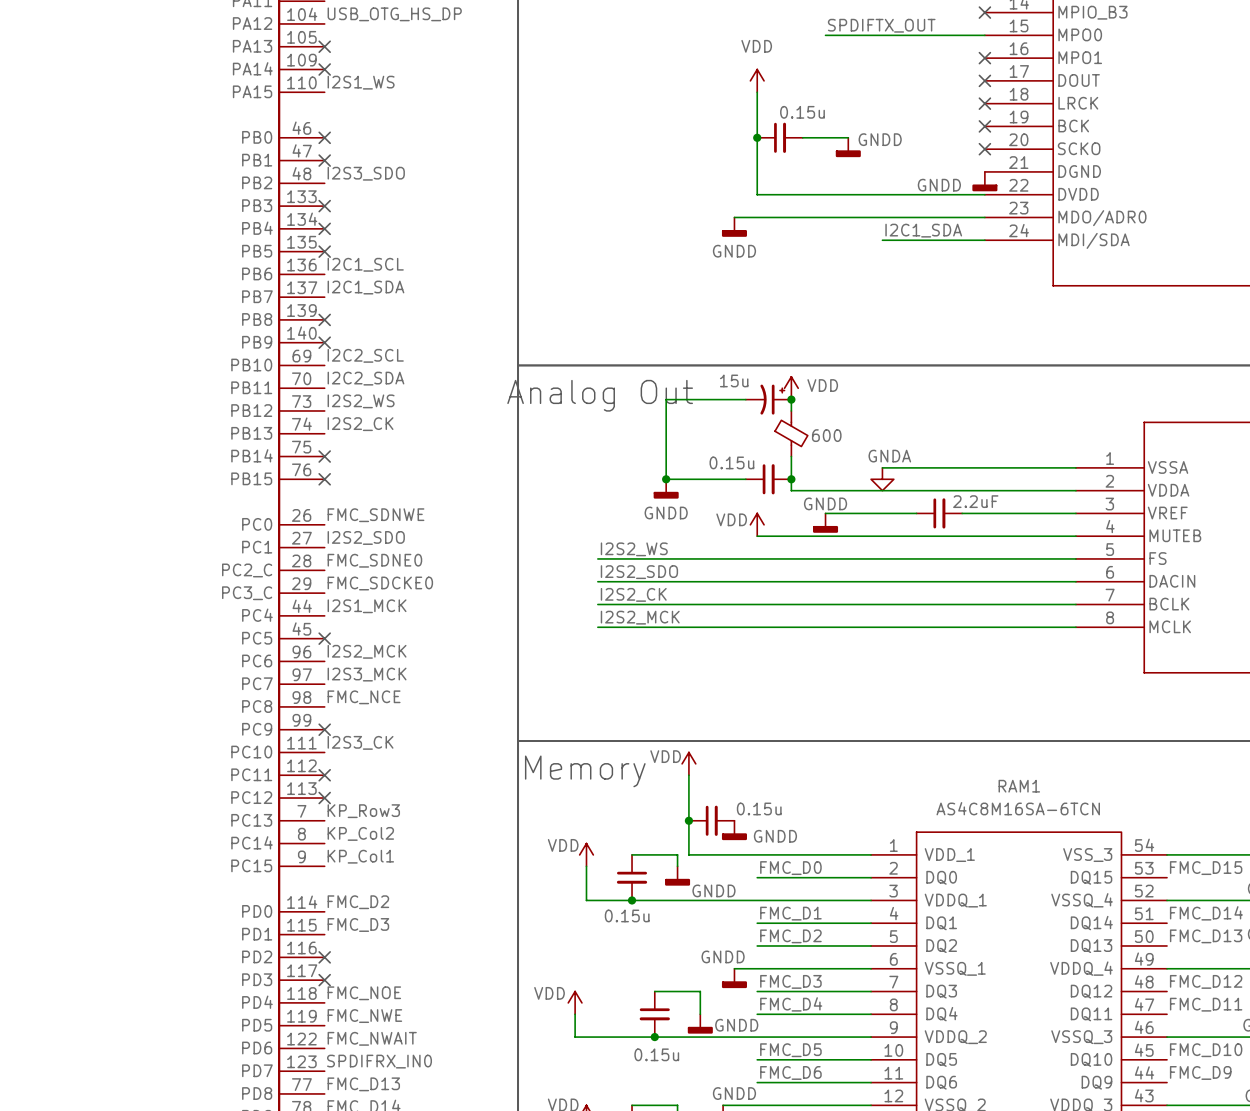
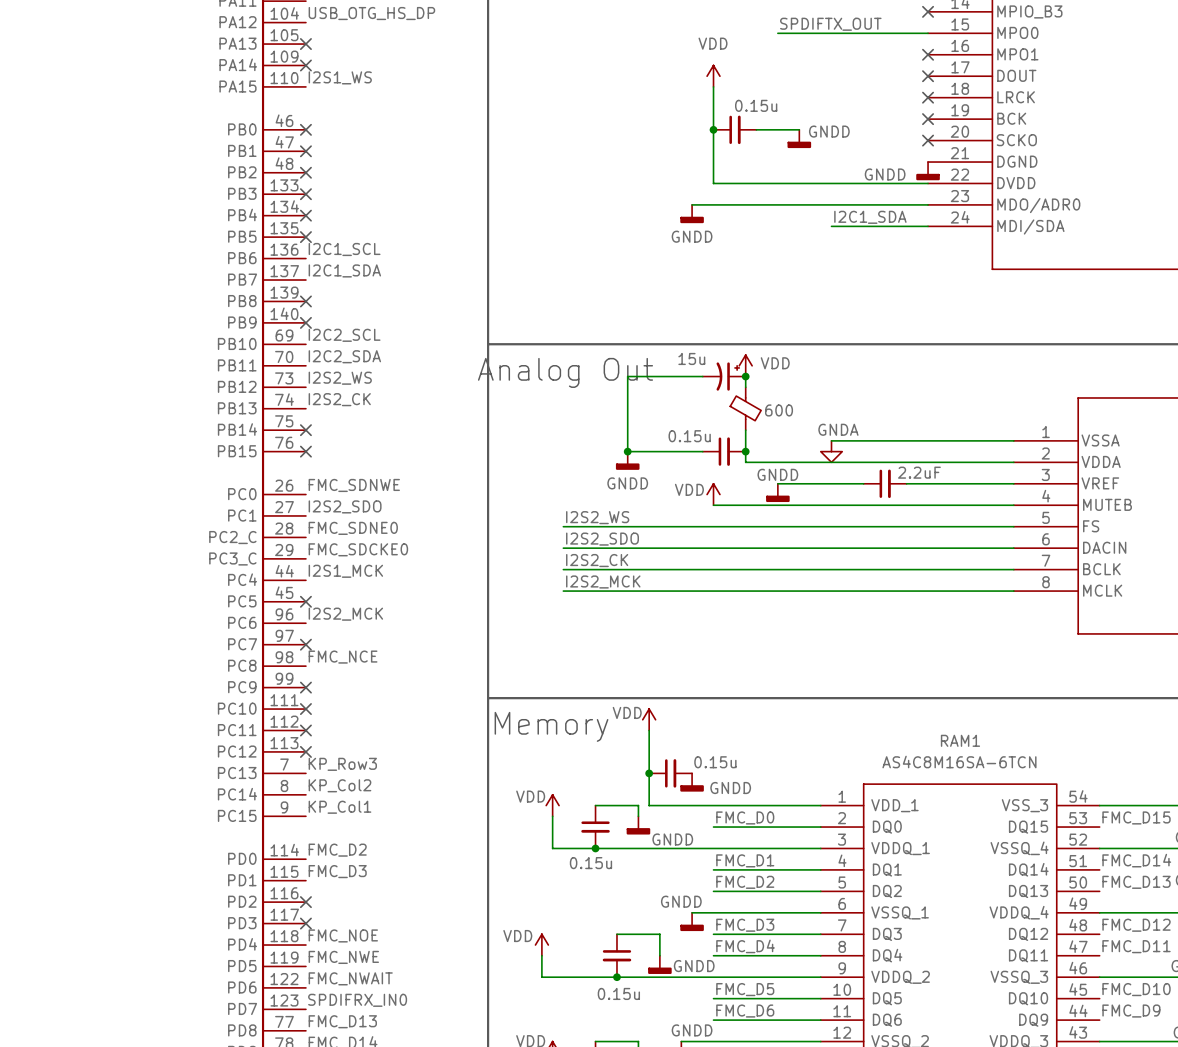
label: I2S3_SDO (366, 173) -> none
no-connect mark: none -> (305, 172)
label: I2S3_MCK (367, 674) -> none
no-connect mark: none -> (305, 644)
label: I2S3_CK (360, 742) -> none
no-connect mark: none -> (305, 709)

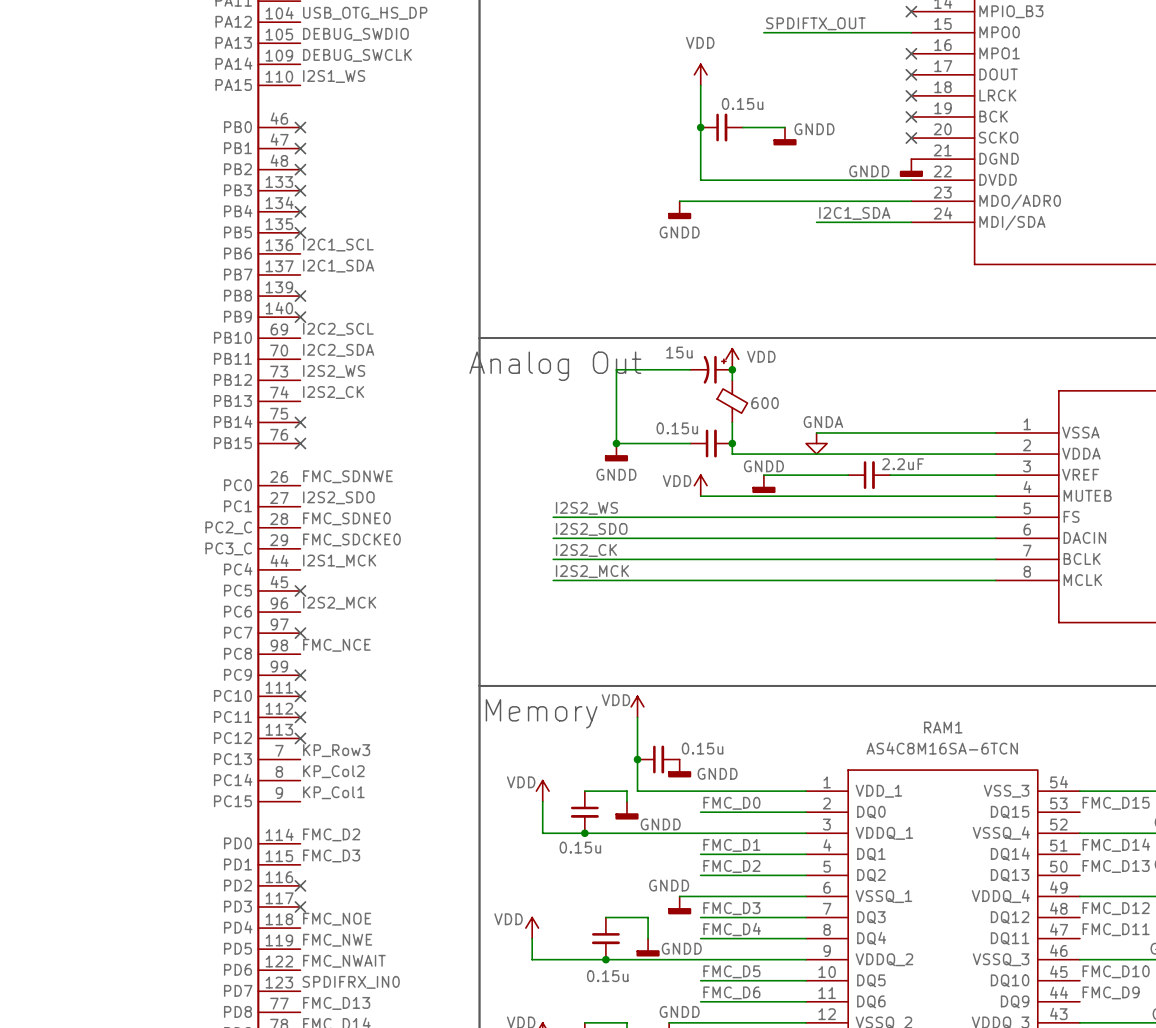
label: none -> DEBUG_SWDIO (355, 34)
no-connect mark: (305, 44) -> none
label: none -> DEBUG_SWCLK (357, 55)
no-connect mark: (305, 65) -> none

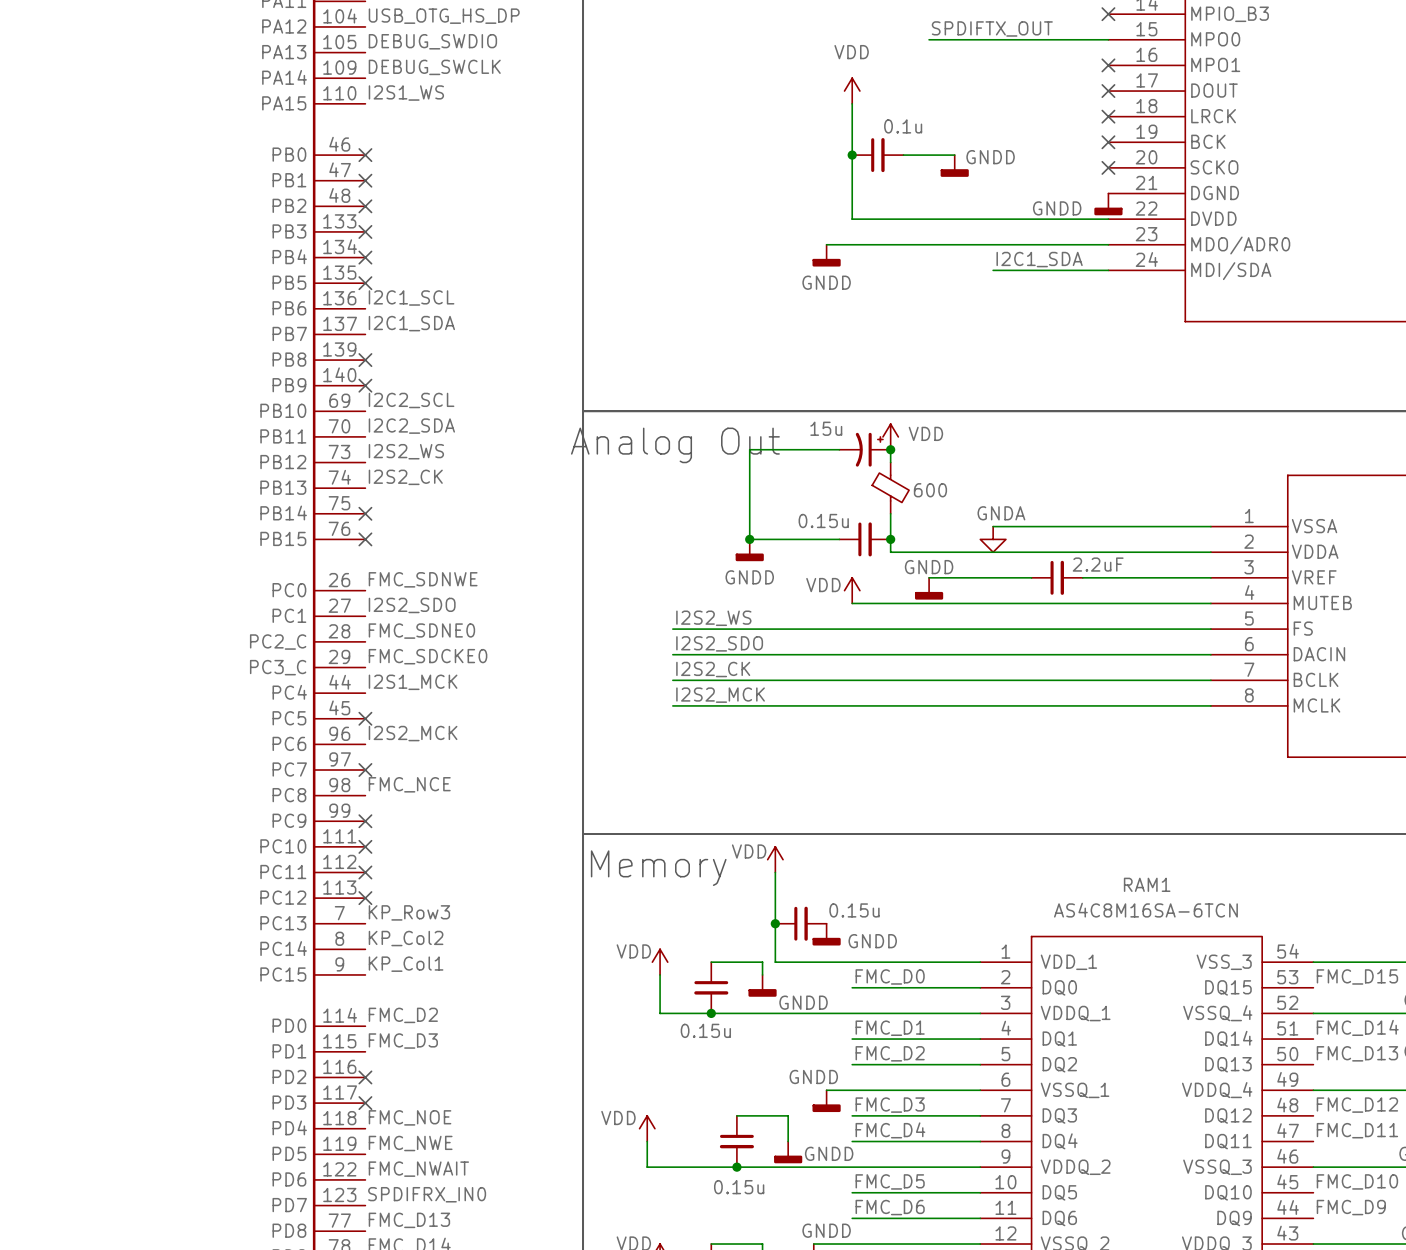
part value: 0.15u (742, 103) -> 0.1u (903, 126)

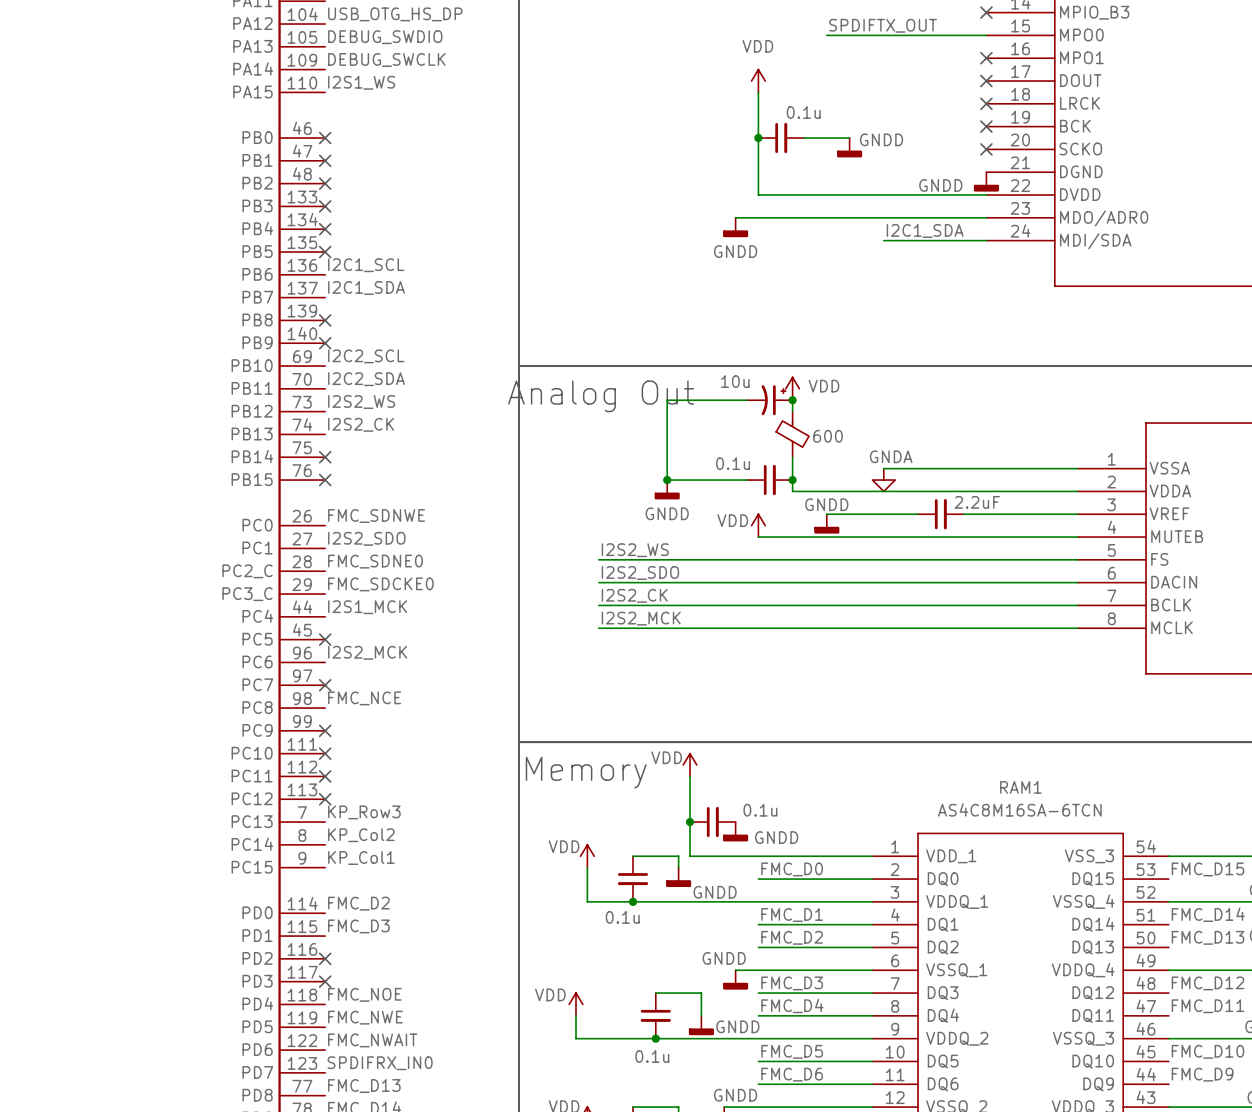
part value: 15u (826, 428) -> 10u (735, 381)
part value: 0.15u (823, 520) -> 0.1u (733, 463)
part value: 0.15u (854, 910) -> 0.1u (760, 810)
part value: 0.15u (705, 1030) -> 0.1u (622, 917)
part value: 0.15u (739, 1187) -> 0.1u (652, 1056)

